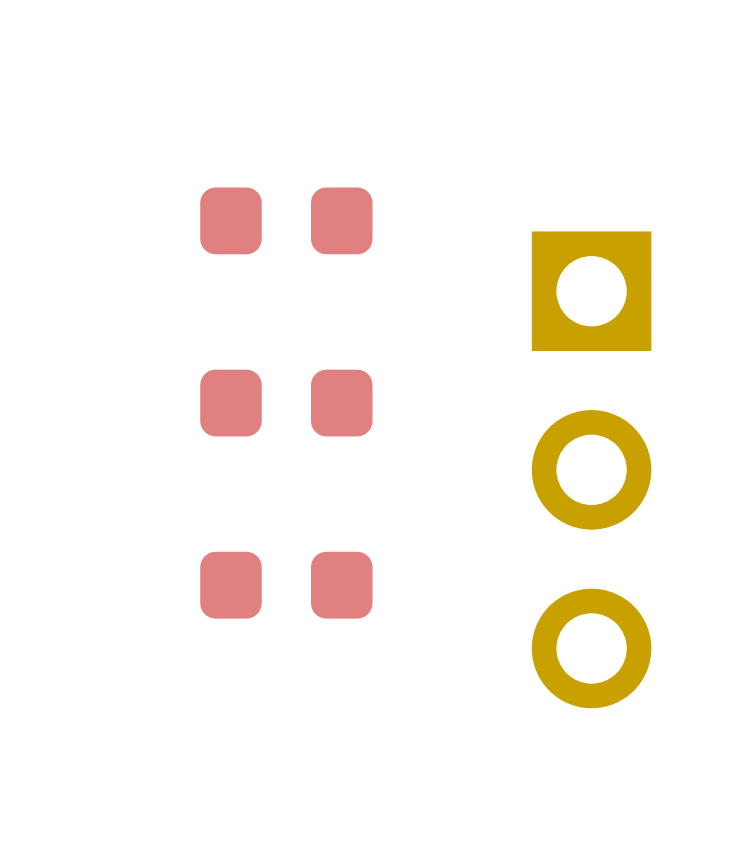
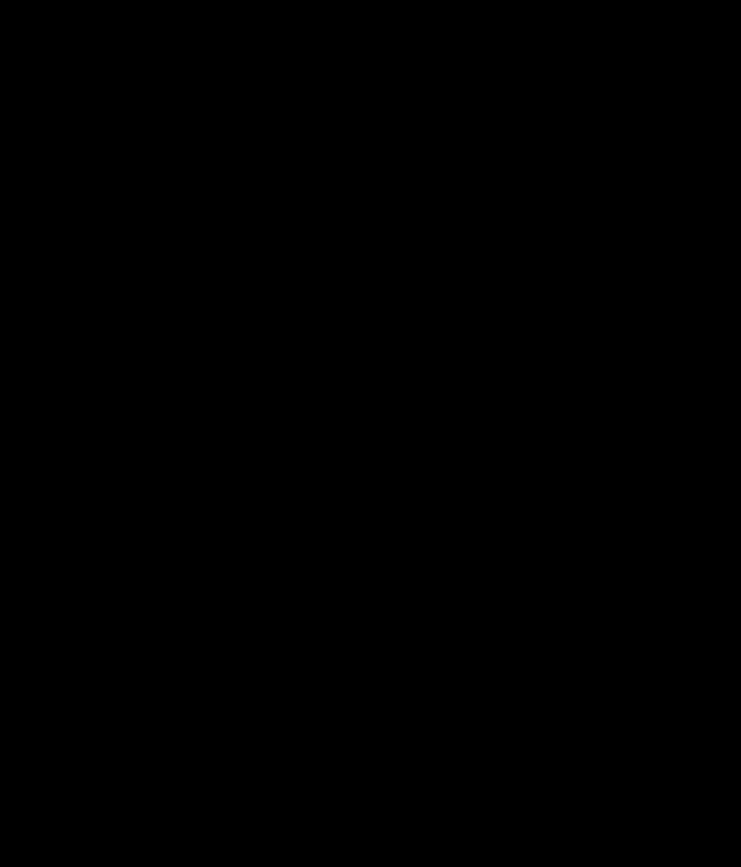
part: (286, 220) -> none
part: (286, 403) -> none
part: (591, 469) -> none
part: (286, 585) -> none

